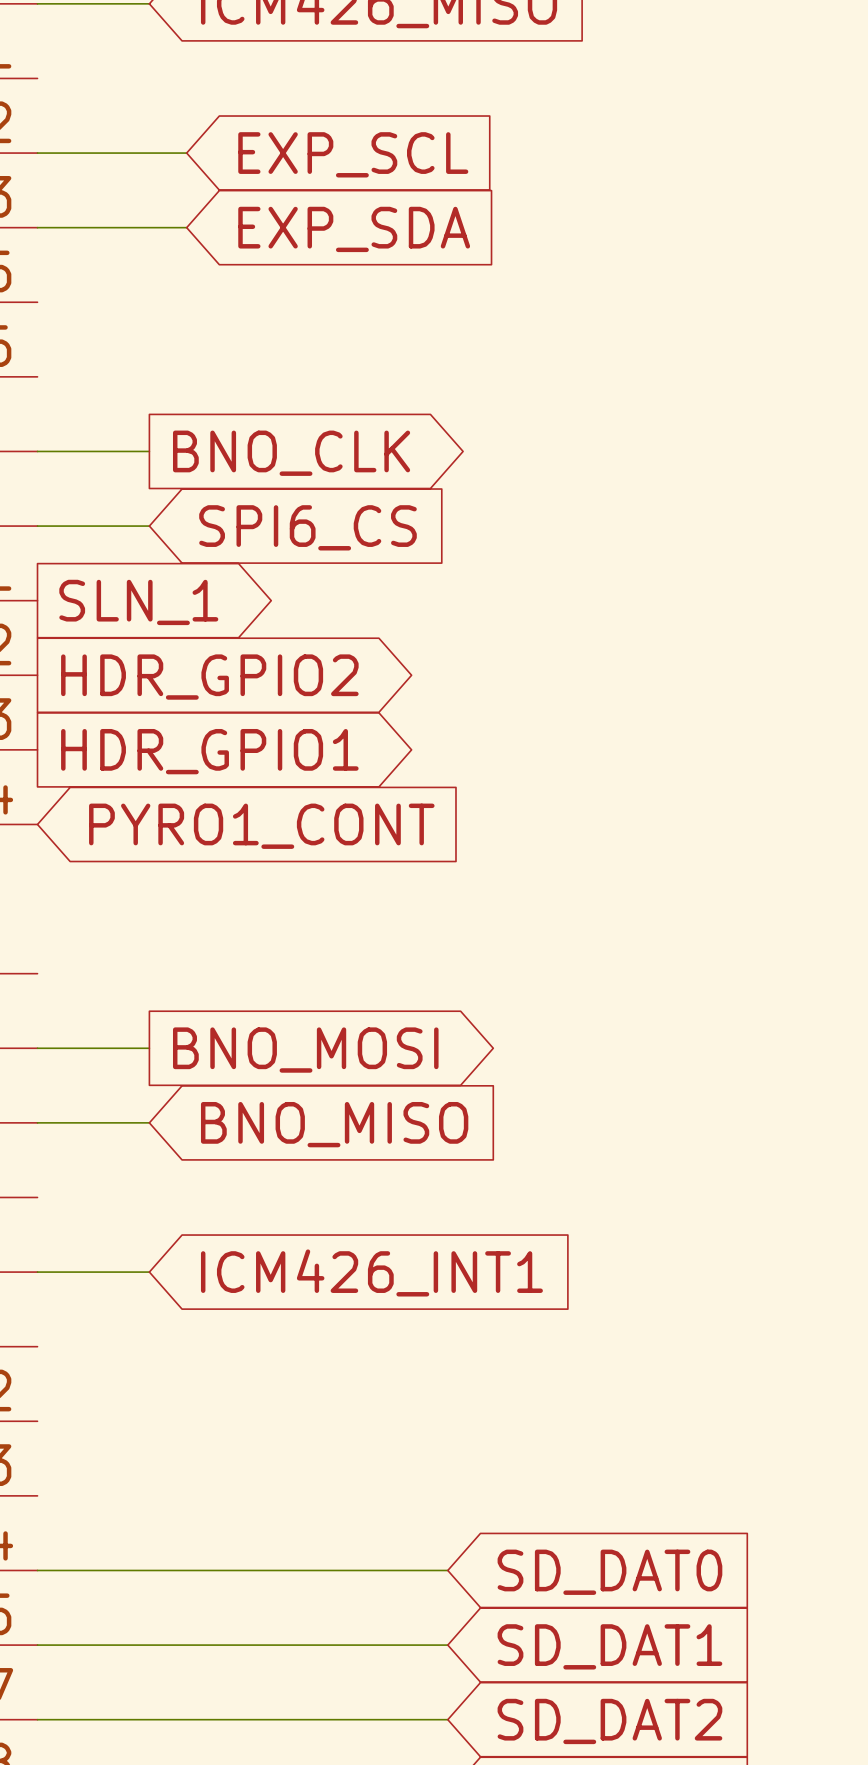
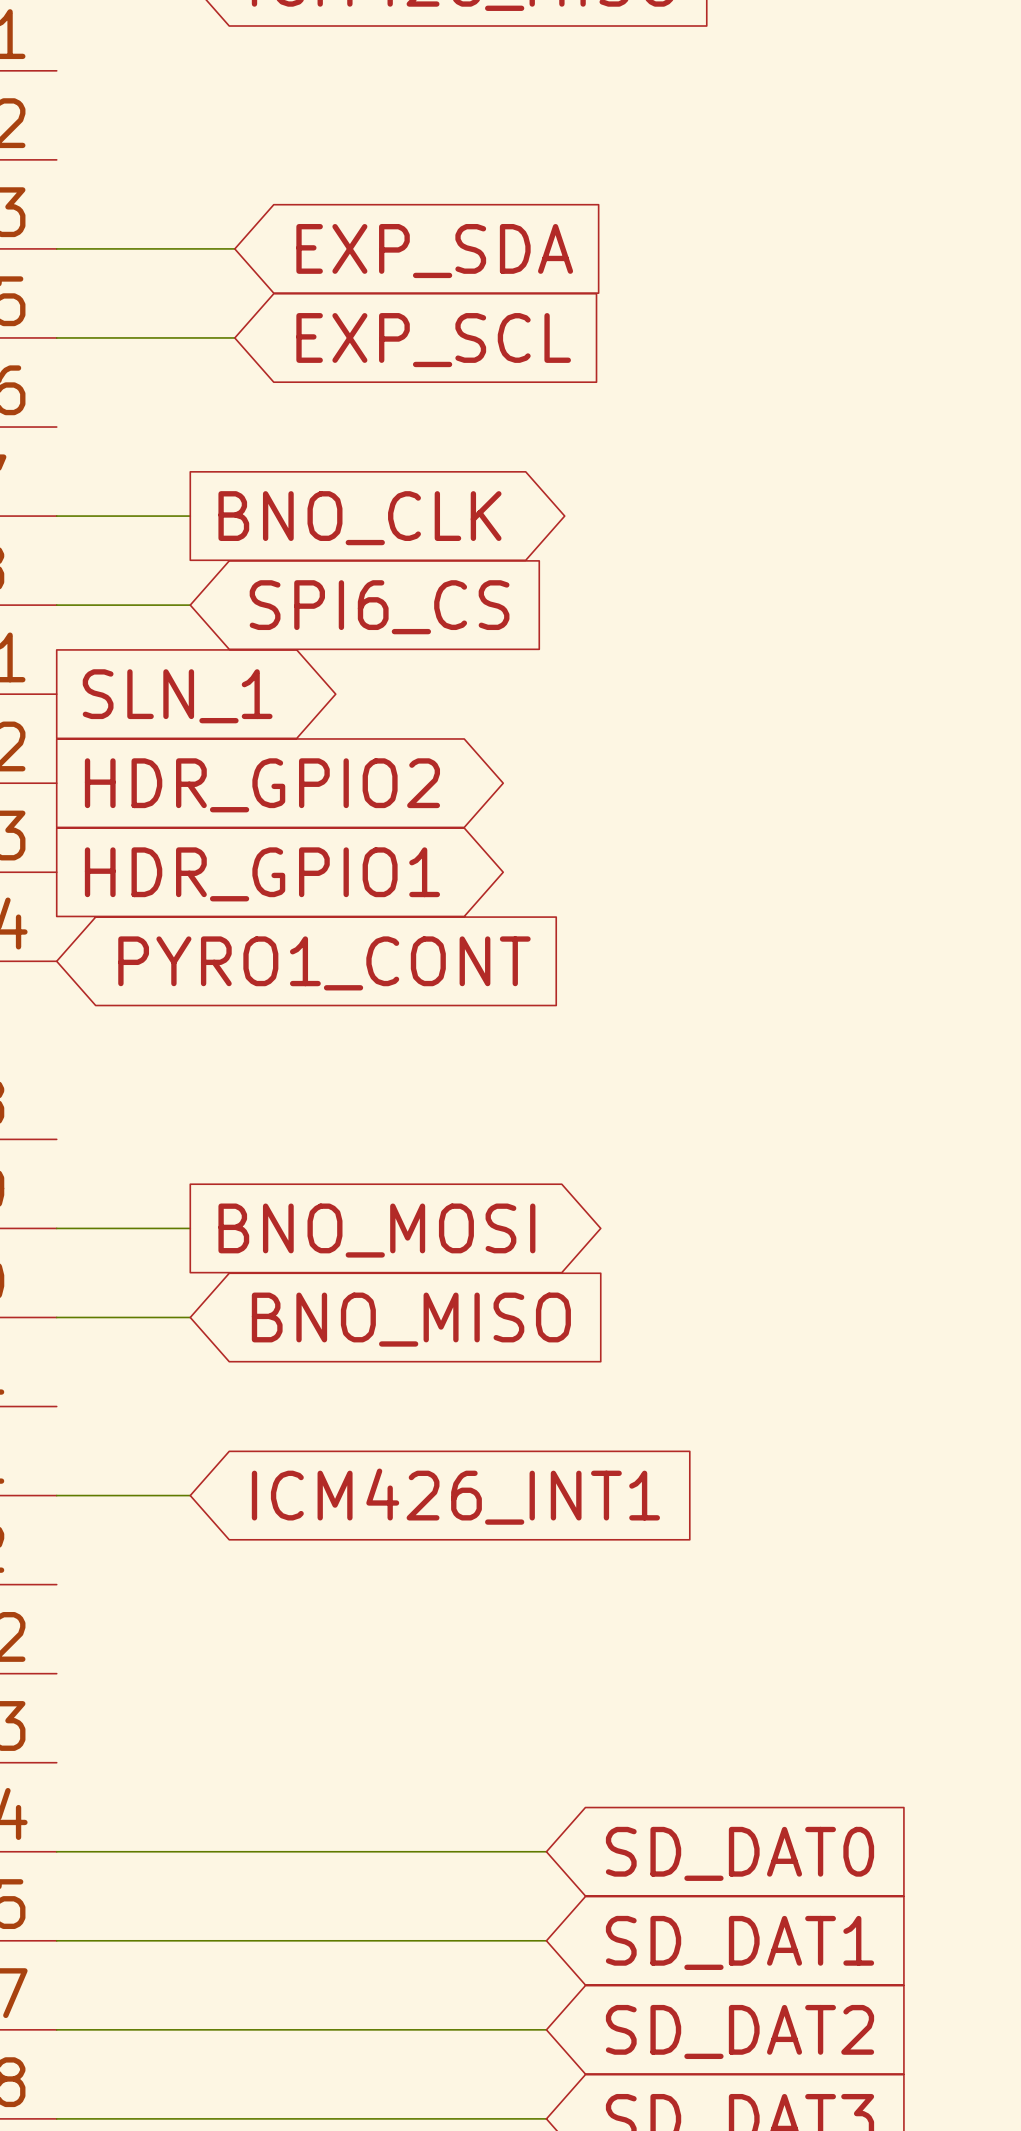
wire: (37, 153) (186, 153) -> (56, 337) (234, 337)
global label position: EXP_SCL (353, 154) -> EXP_SCL (433, 340)

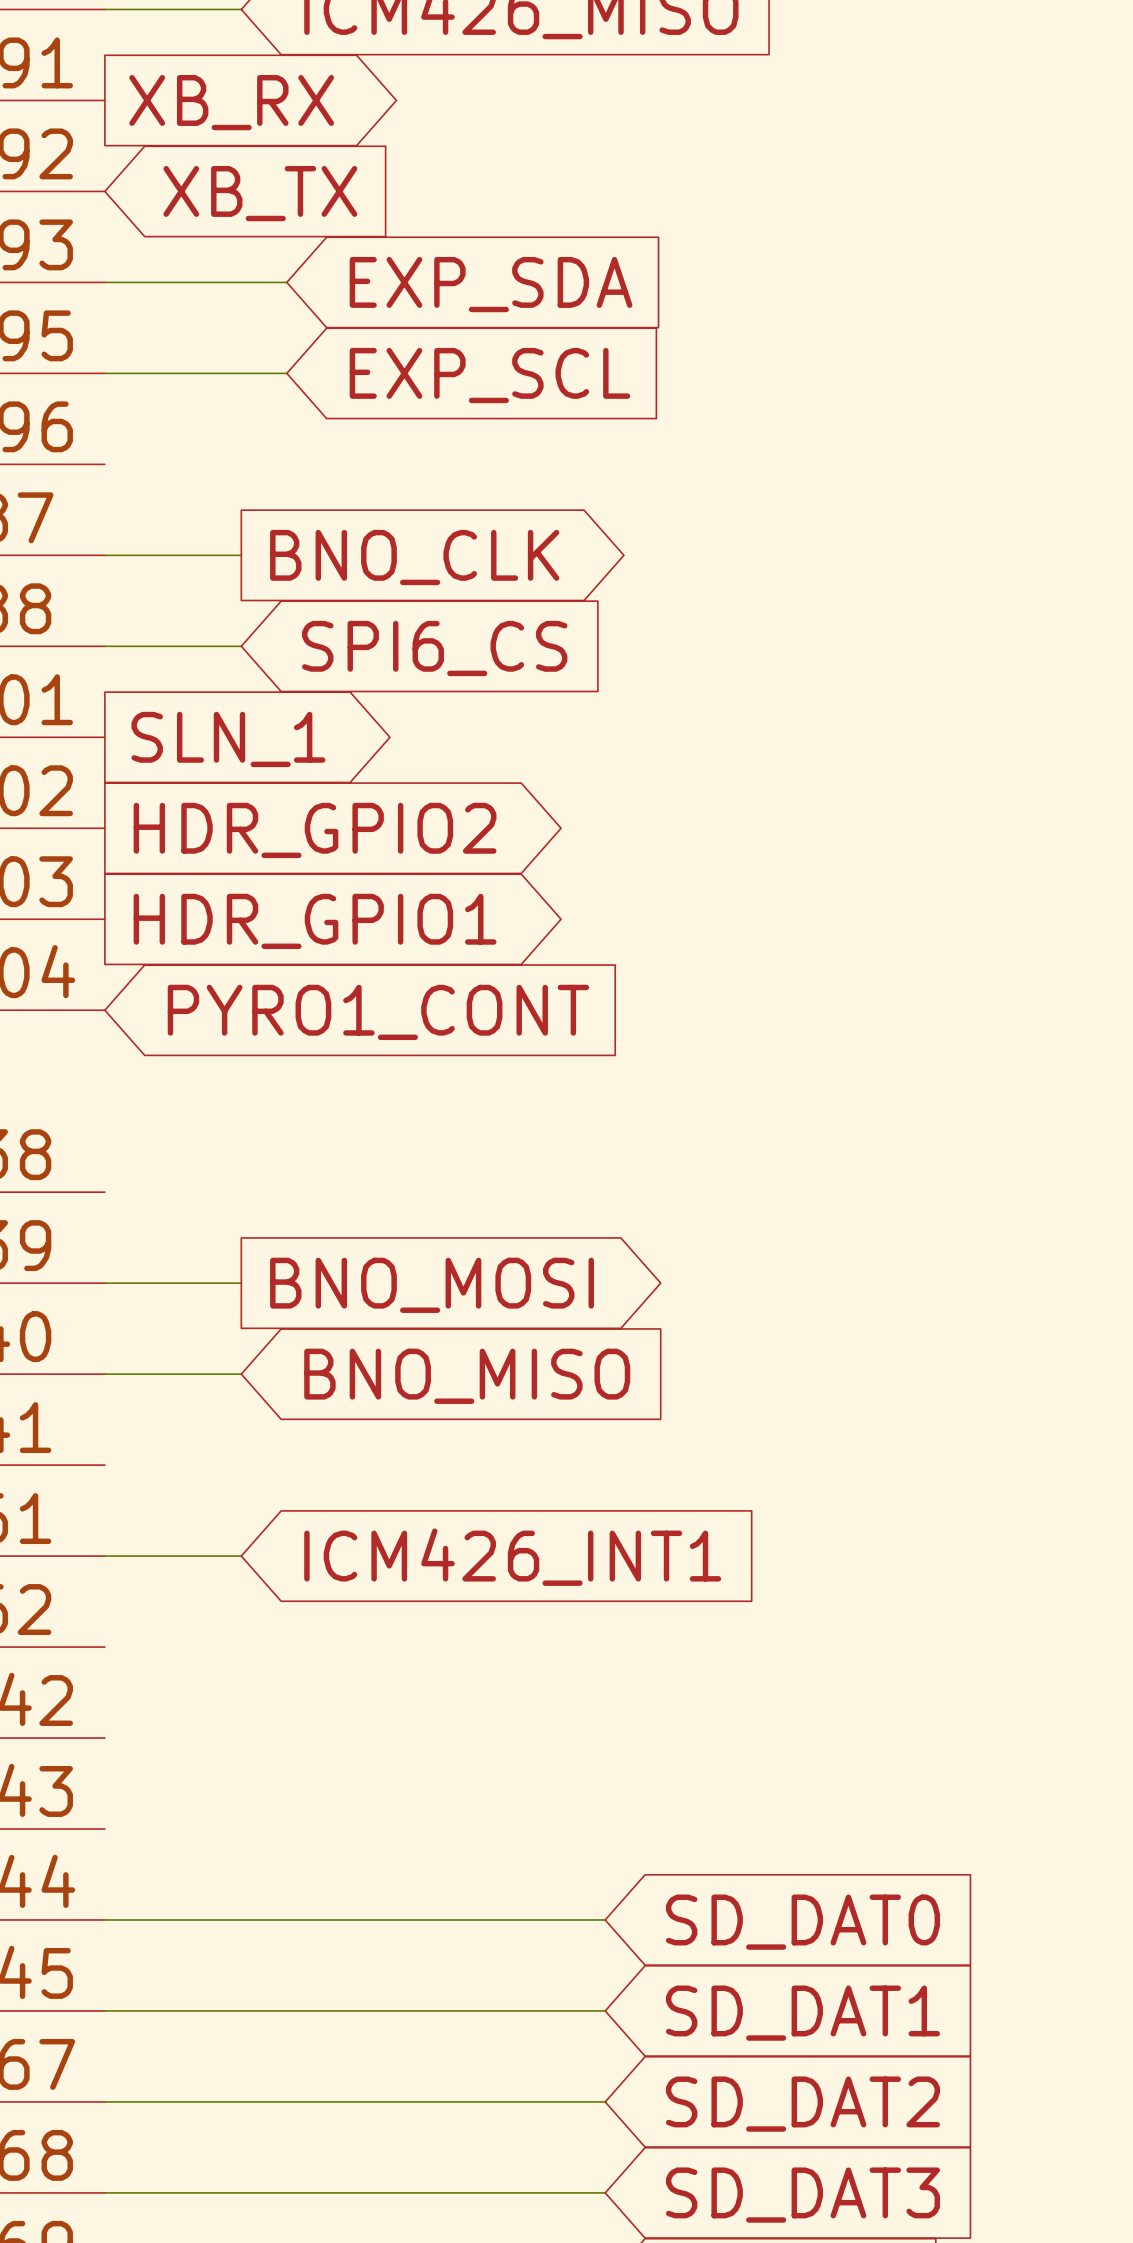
global label: none -> XB_RX (231, 102)
global label: none -> XB_TX (260, 193)

